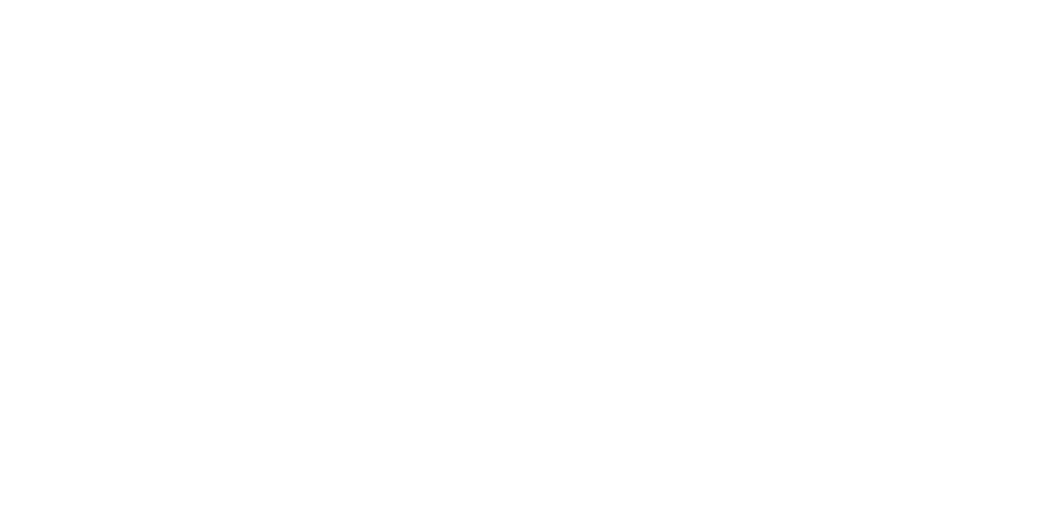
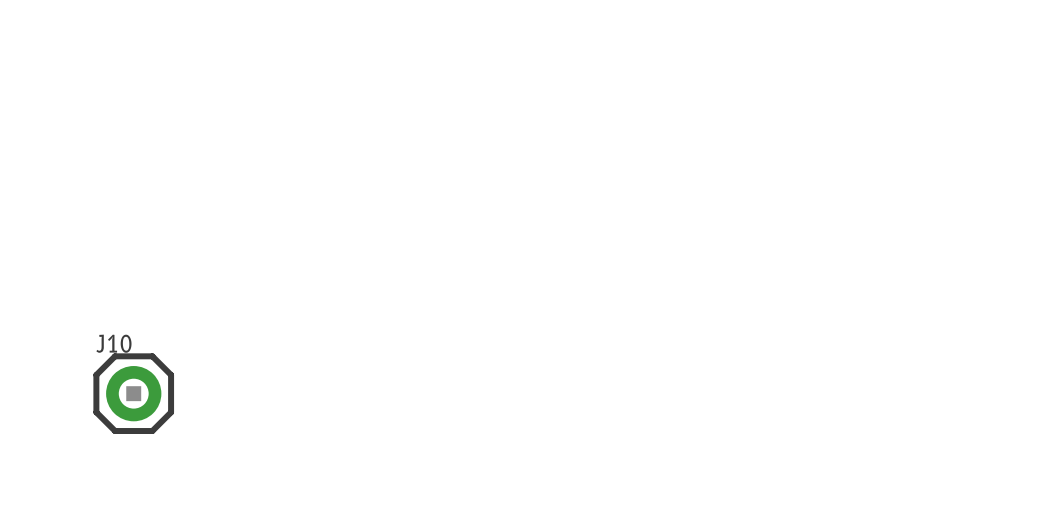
J10: none -> (133, 393)

